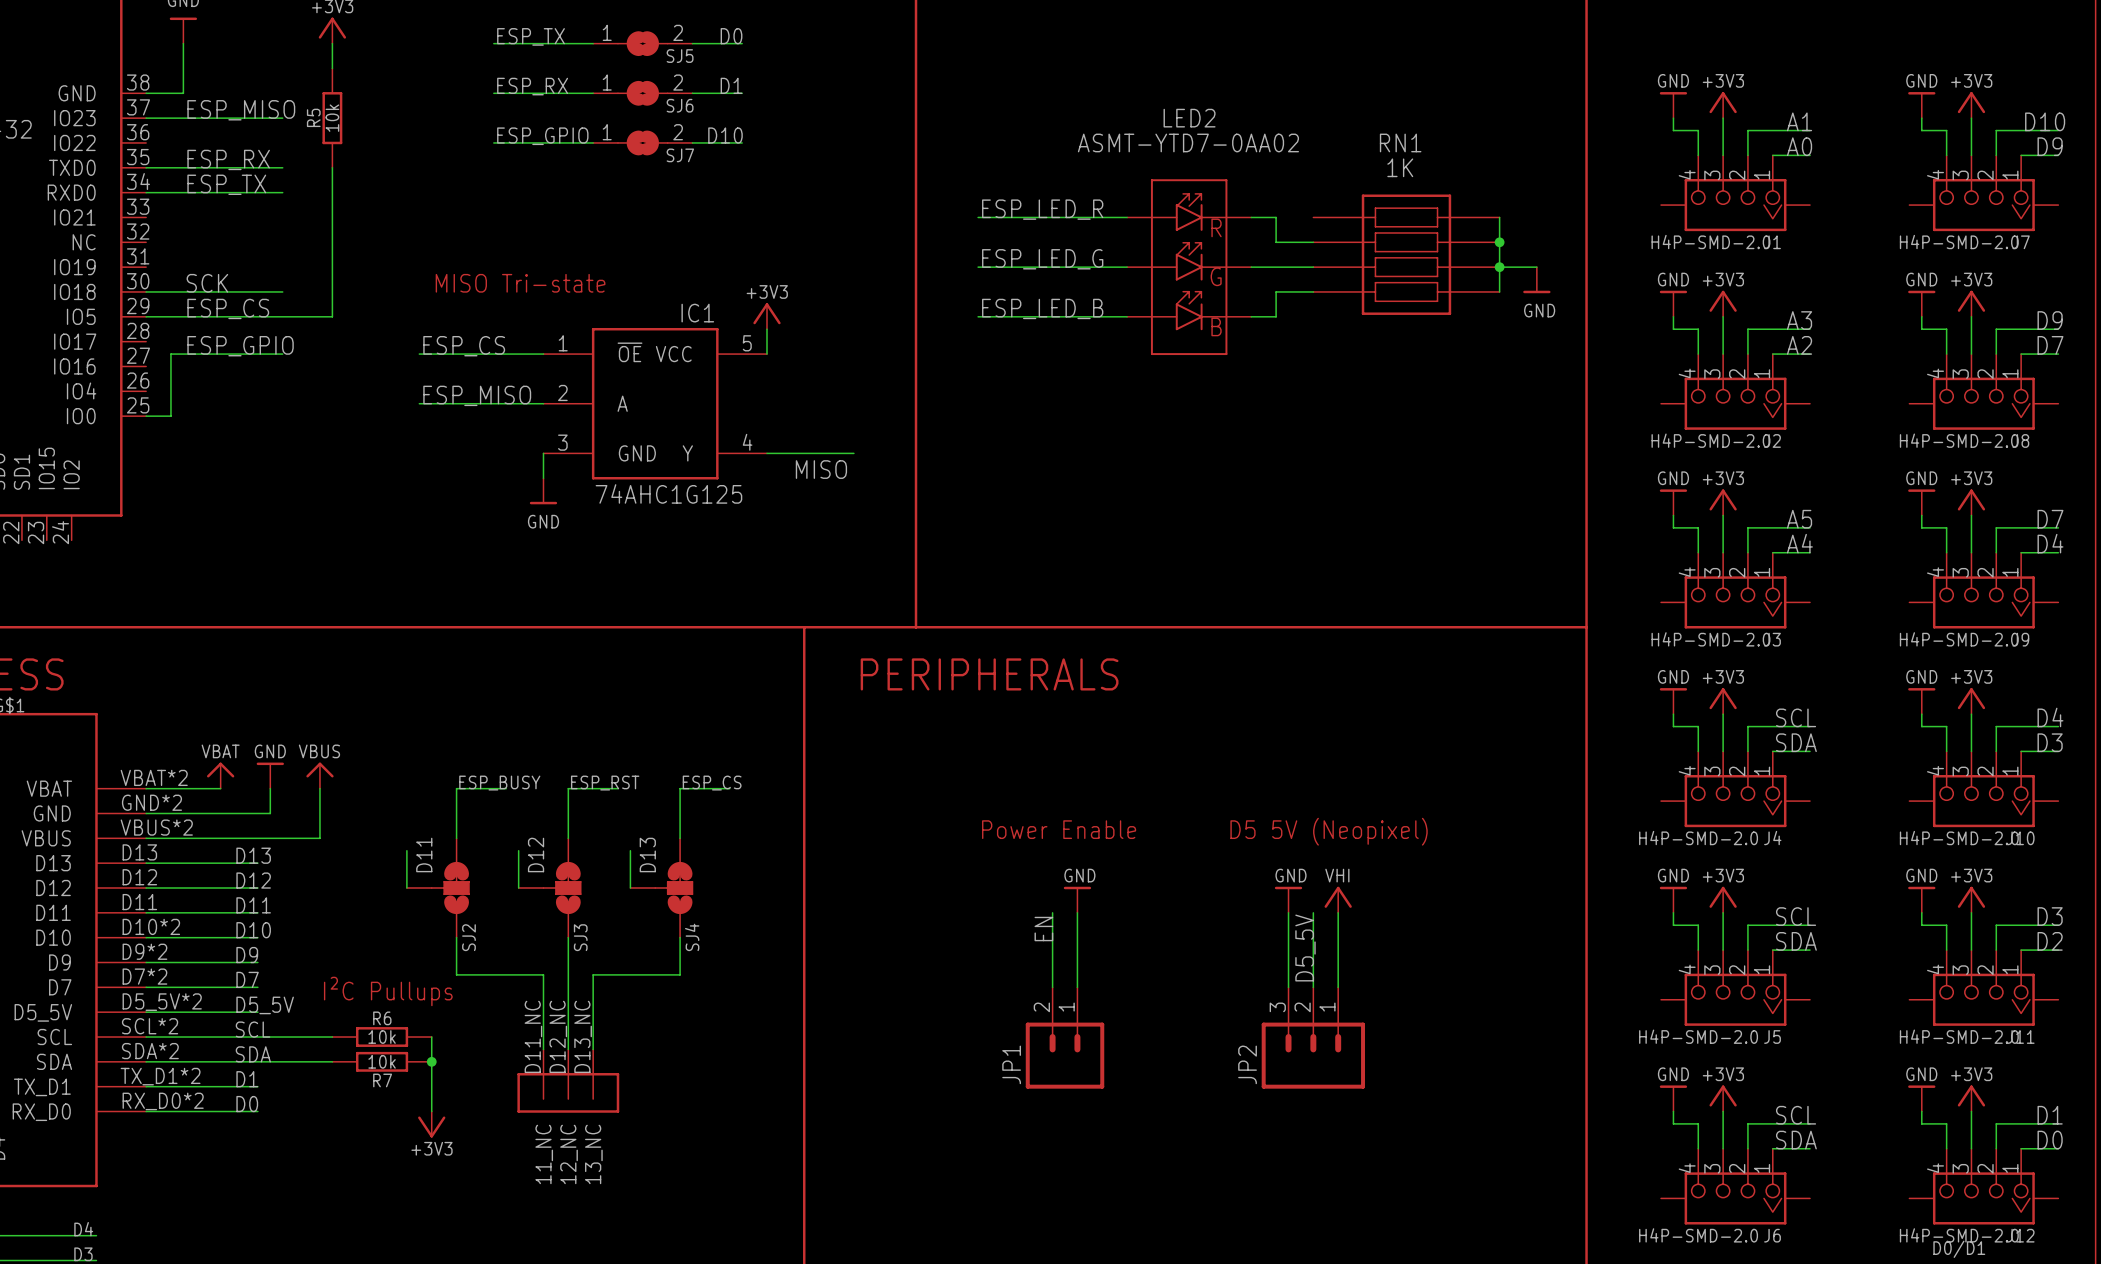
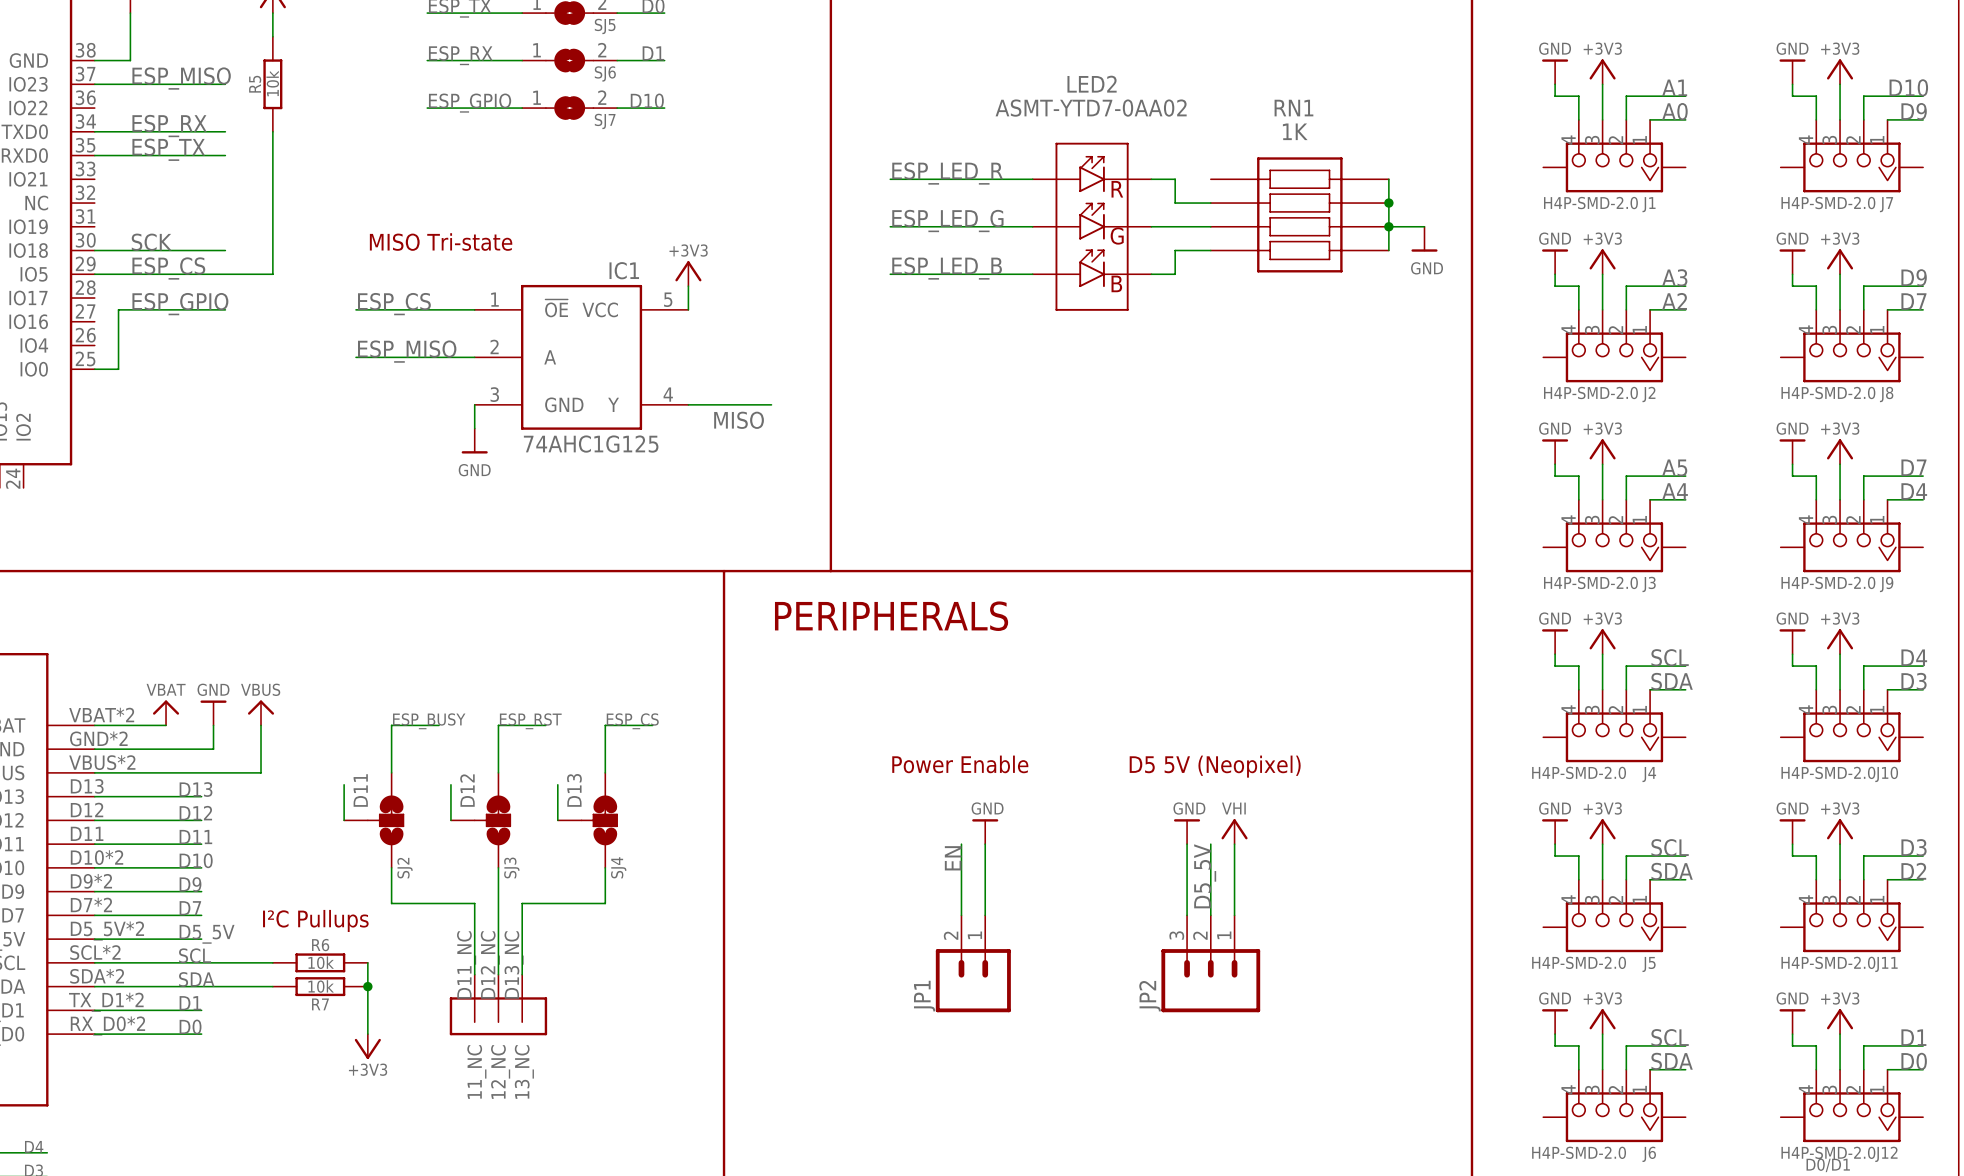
part pin number: 35 (138, 157) -> 34 (85, 121)
part pin number: 34 (138, 181) -> 35 (85, 145)

